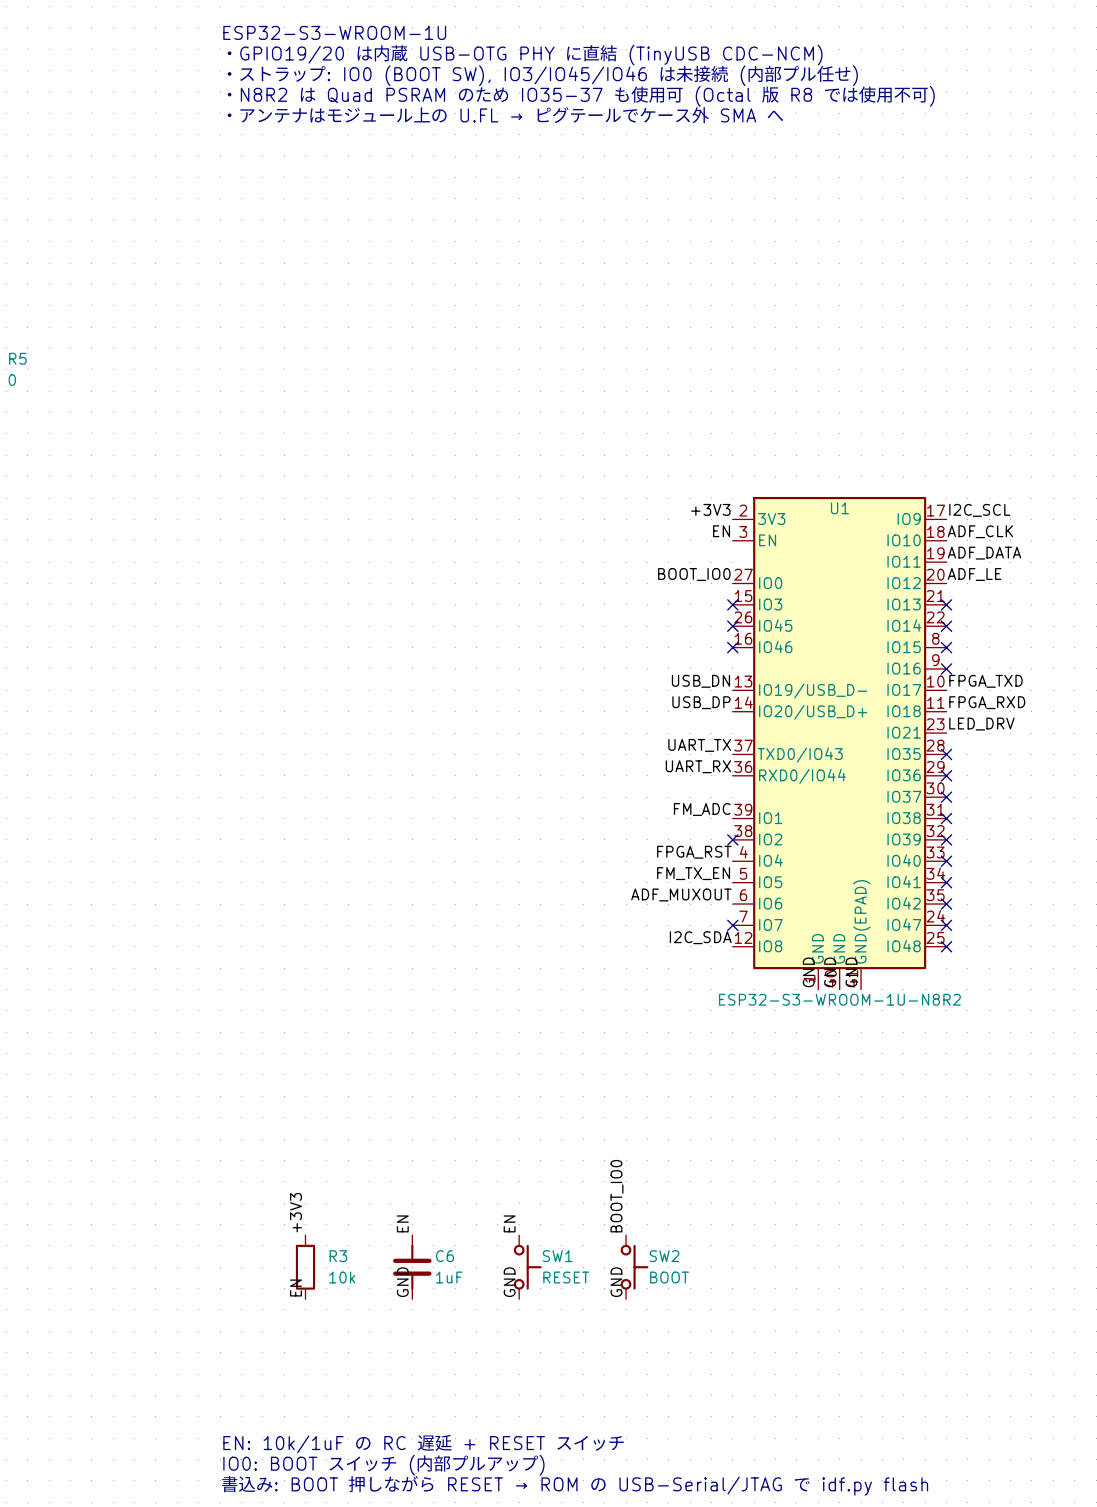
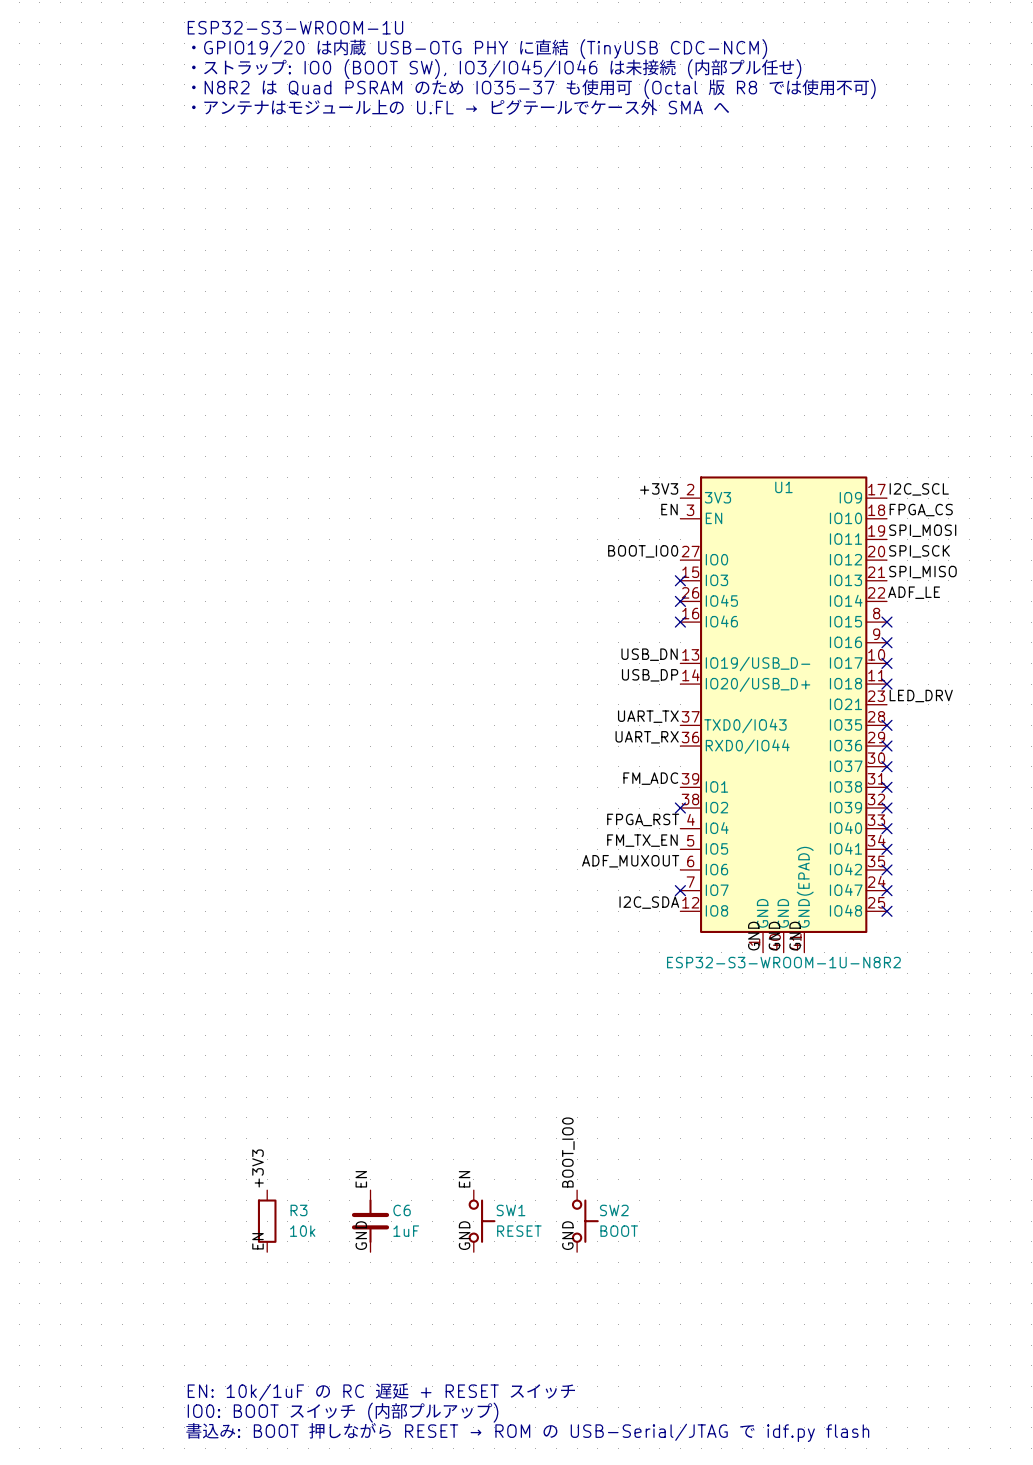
label: ADF_CLK (980, 531) -> FPGA_CS (921, 510)
label: ADF_DATA (984, 553) -> SPI_MOSI (922, 530)
label: ADF_LE (974, 574) -> SPI_SCK (919, 551)
label: none -> SPI_MISO (922, 572)
no-connect mark: (946, 604) -> none
label: none -> ADF_LE (914, 592)
no-connect mark: (946, 626) -> none
label: FPGA_TXD (986, 681) -> none
no-connect mark: none -> (886, 663)
label: FPGA_RXD (987, 702) -> none
no-connect mark: none -> (886, 684)

